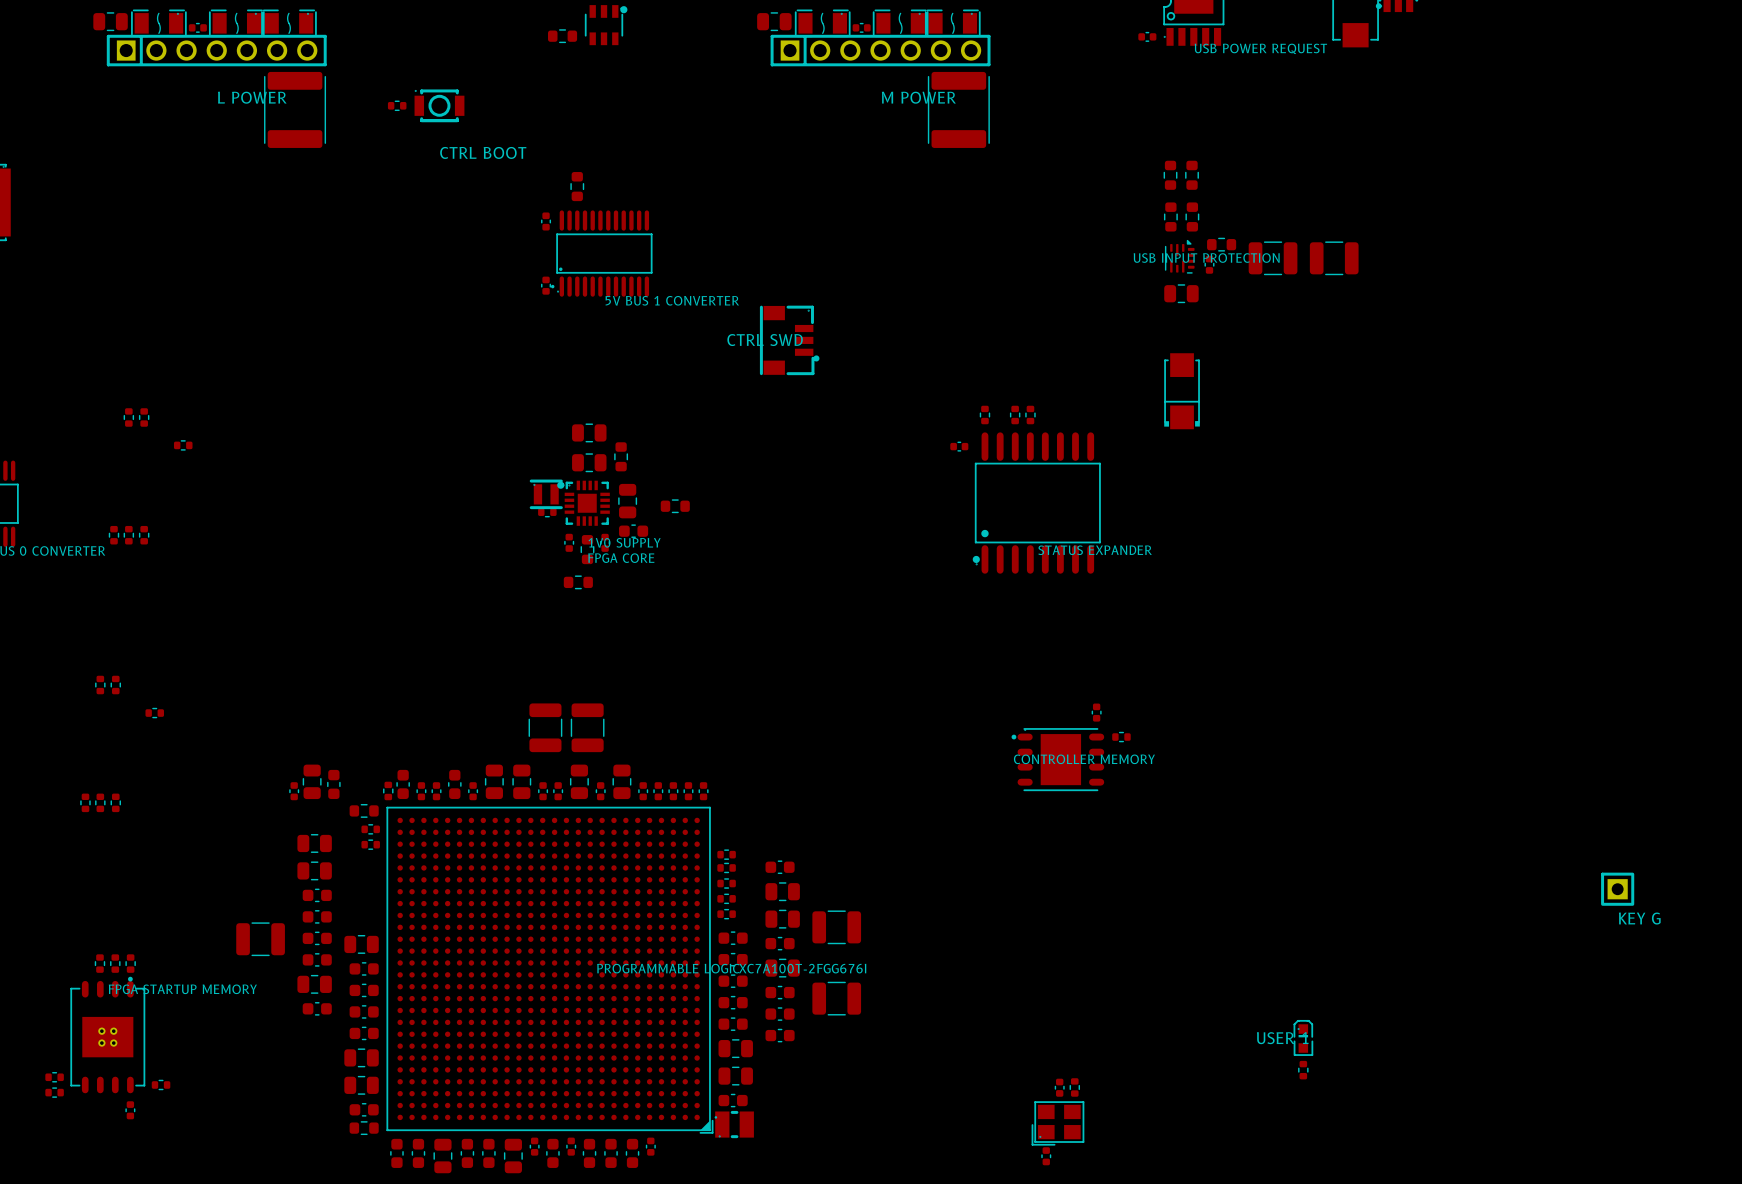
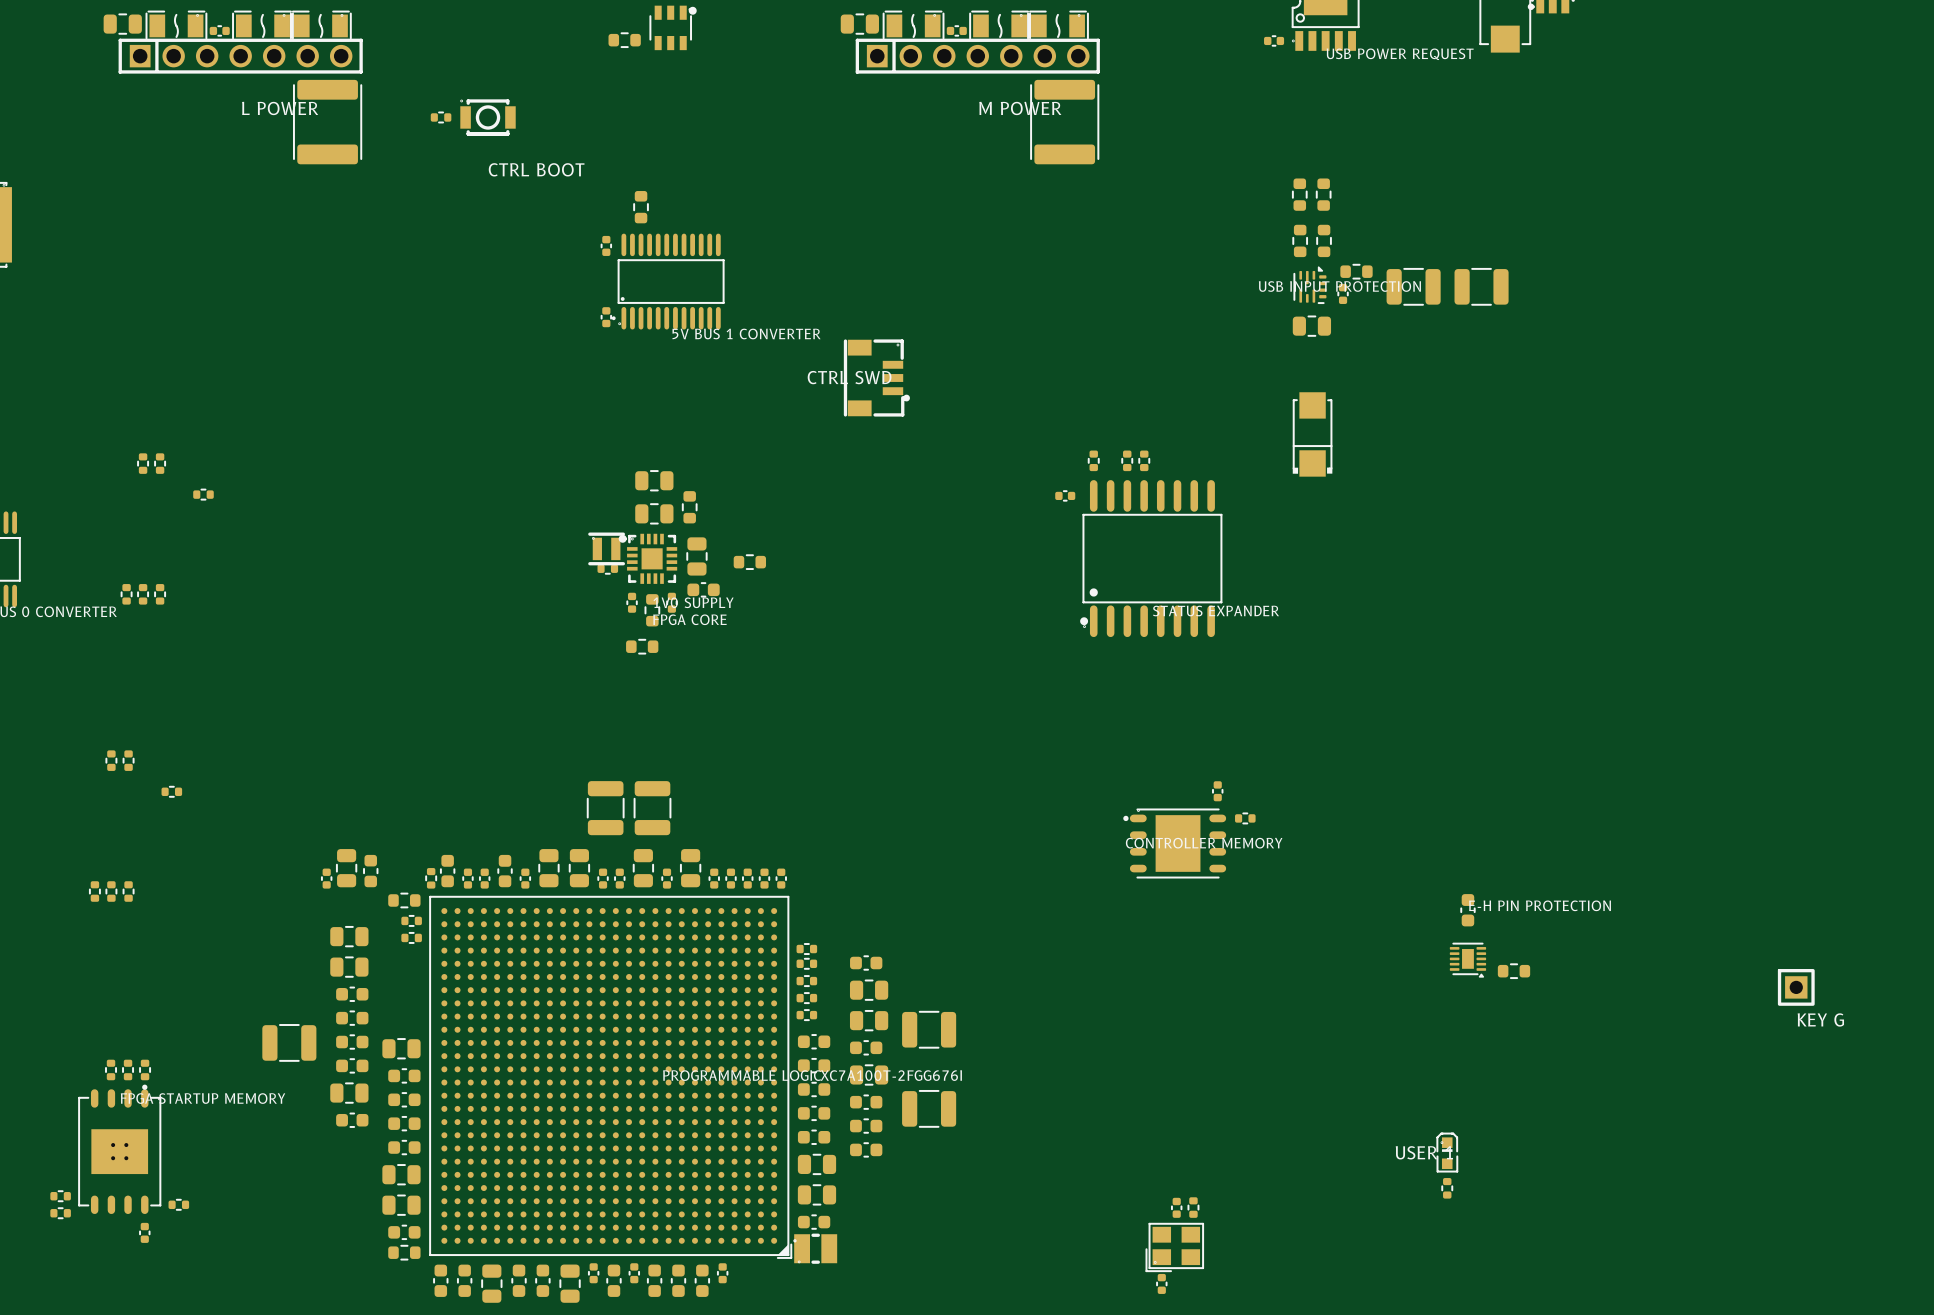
part: none -> (1467, 910)
part: none -> (1467, 960)
part: none -> (1514, 971)

